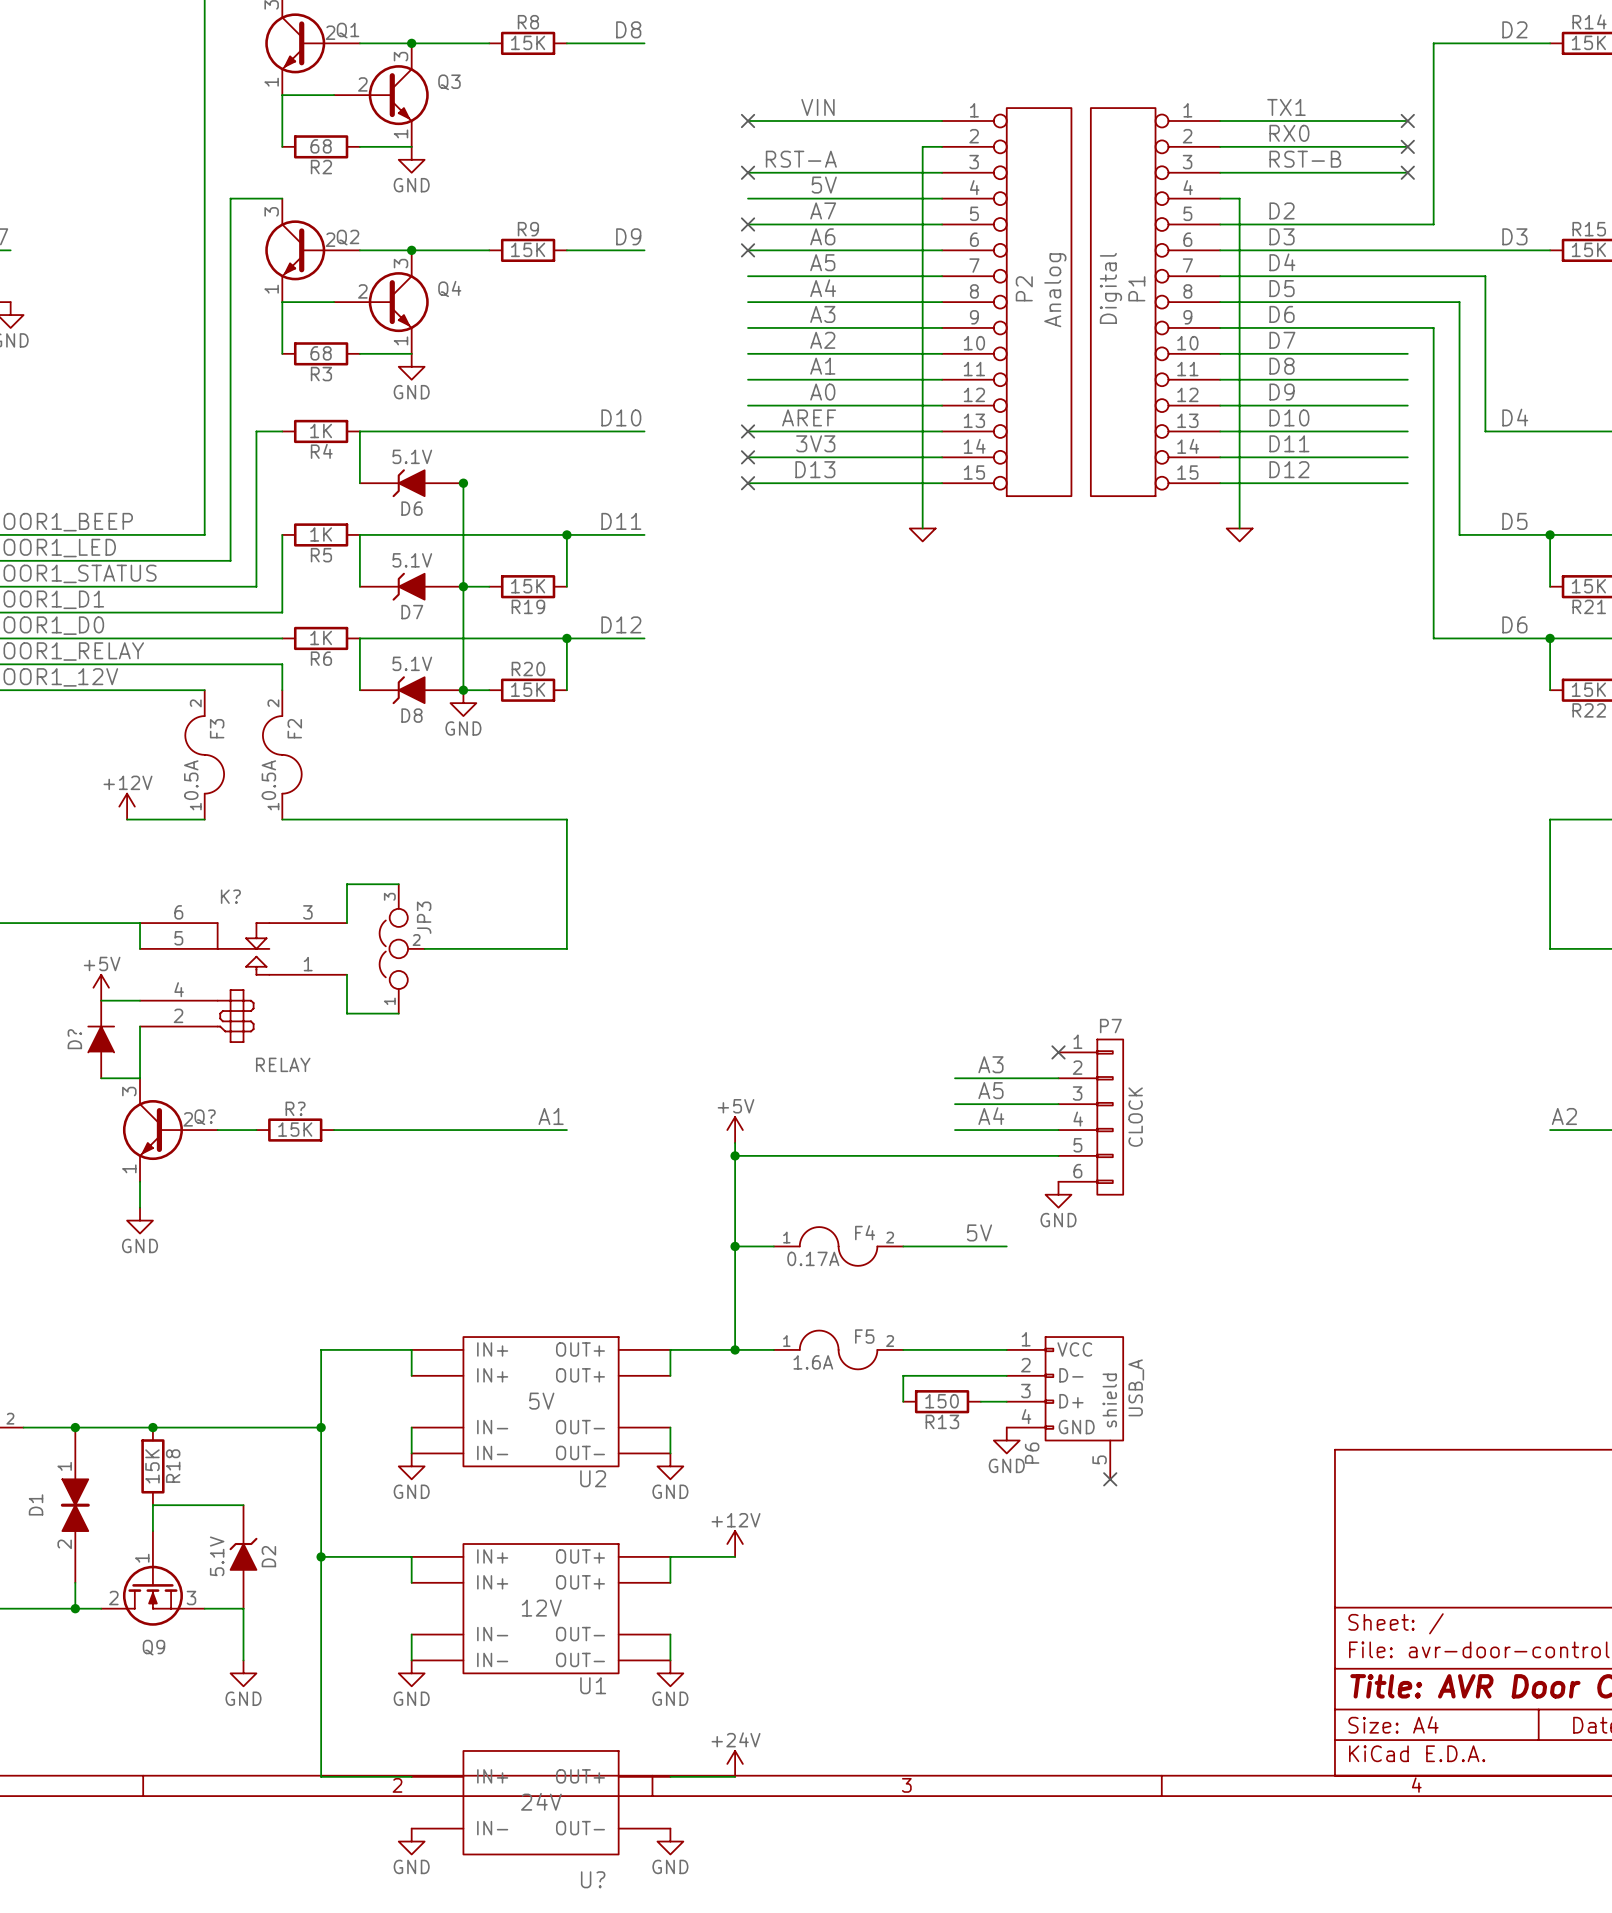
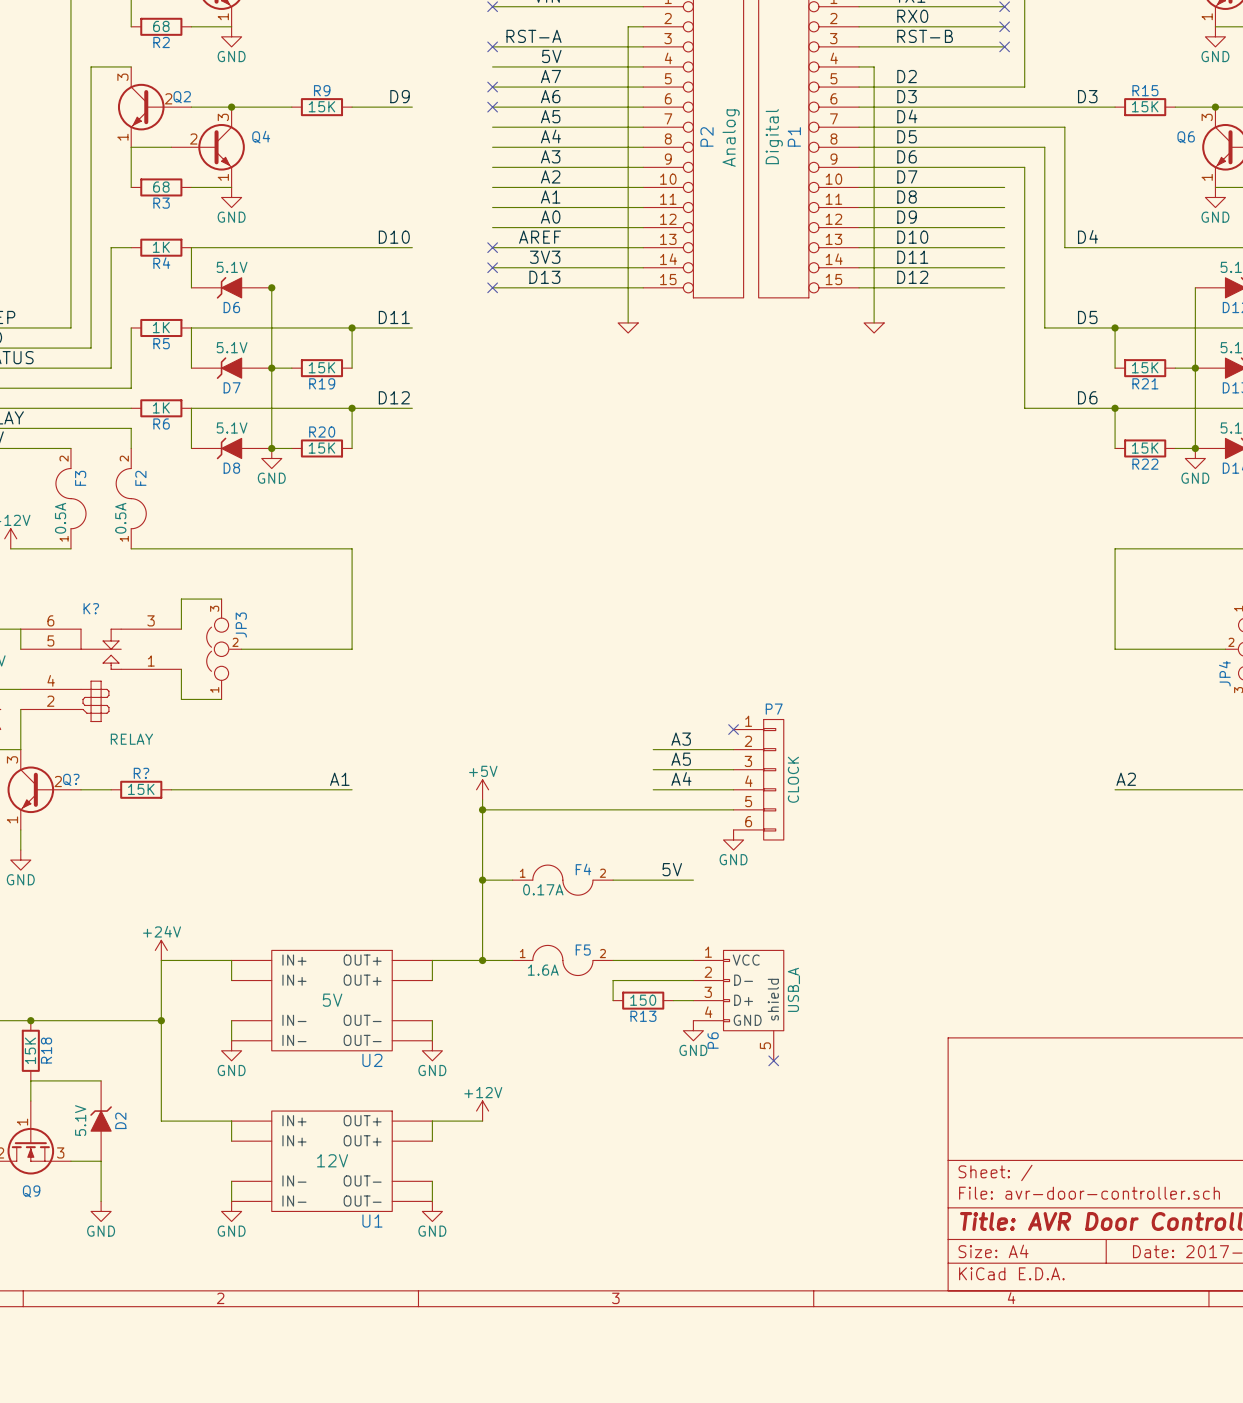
power symbol: none -> +24V (161, 950)
wire: (321, 1556) (321, 1776) (411, 1776) -> none
junction: (321, 1556) -> none
power symbol: +24V (735, 1763) -> none
wire: (670, 1776) (735, 1776) -> none
U?: 24V (541, 1802) -> none
power symbol: GND (411, 1841) -> none
power symbol: GND (670, 1841) -> none

